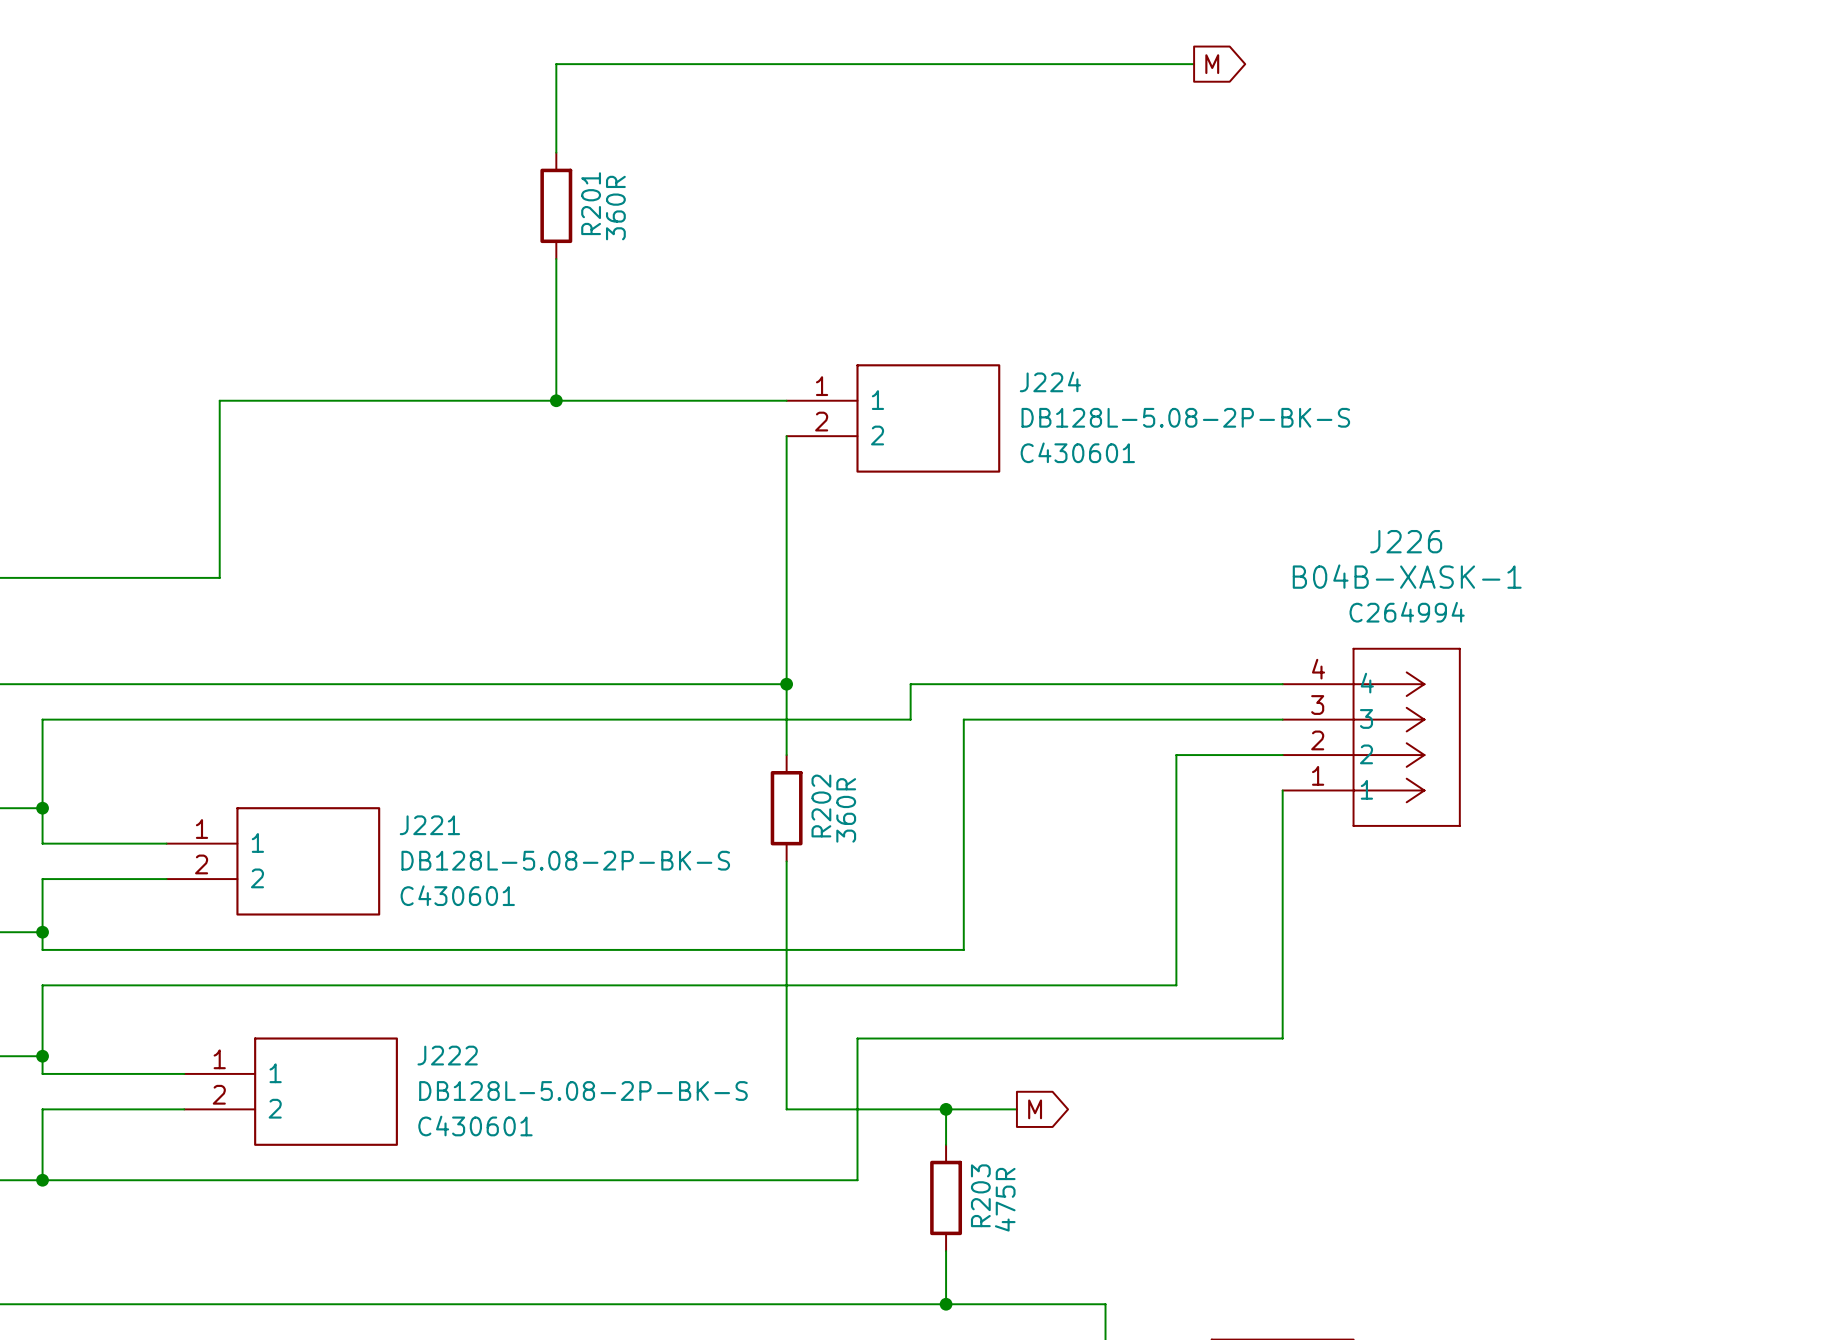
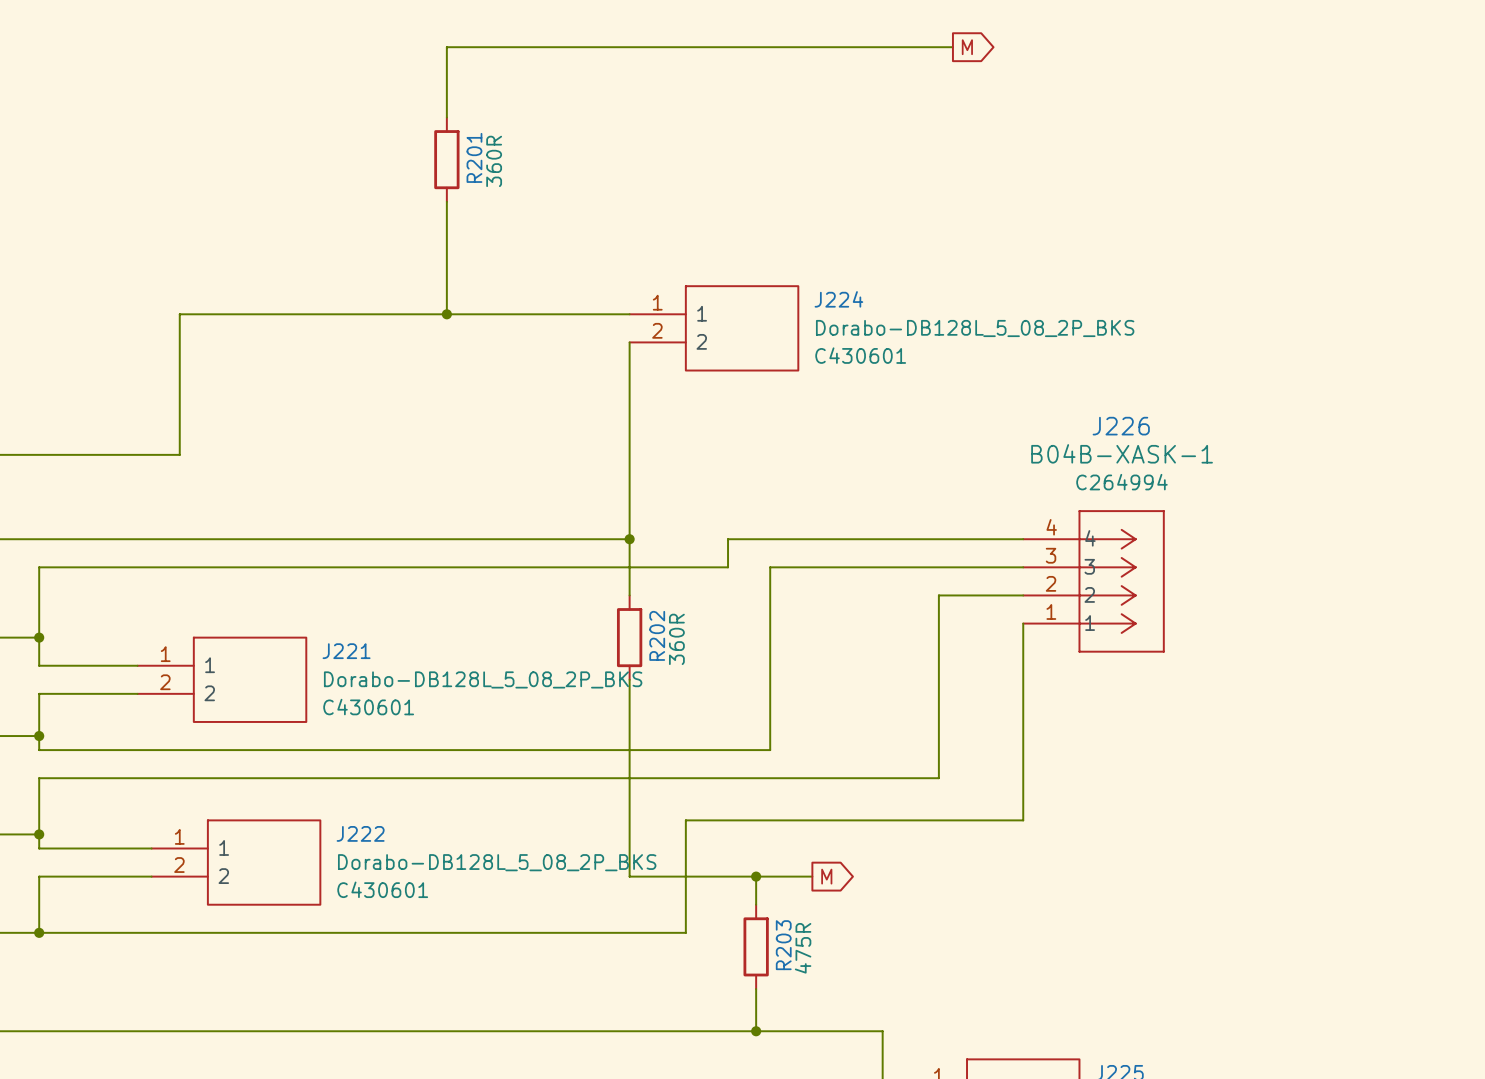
J224 value: DB128L-5.08-2P-BK-S (1185, 417) -> Dorabo-DB128L_5_08_2P_BKS (975, 328)
J221 value: DB128L-5.08-2P-BK-S (565, 860) -> Dorabo-DB128L_5_08_2P_BKS (483, 679)
J222 value: DB128L-5.08-2P-BK-S (583, 1090) -> Dorabo-DB128L_5_08_2P_BKS (497, 862)

